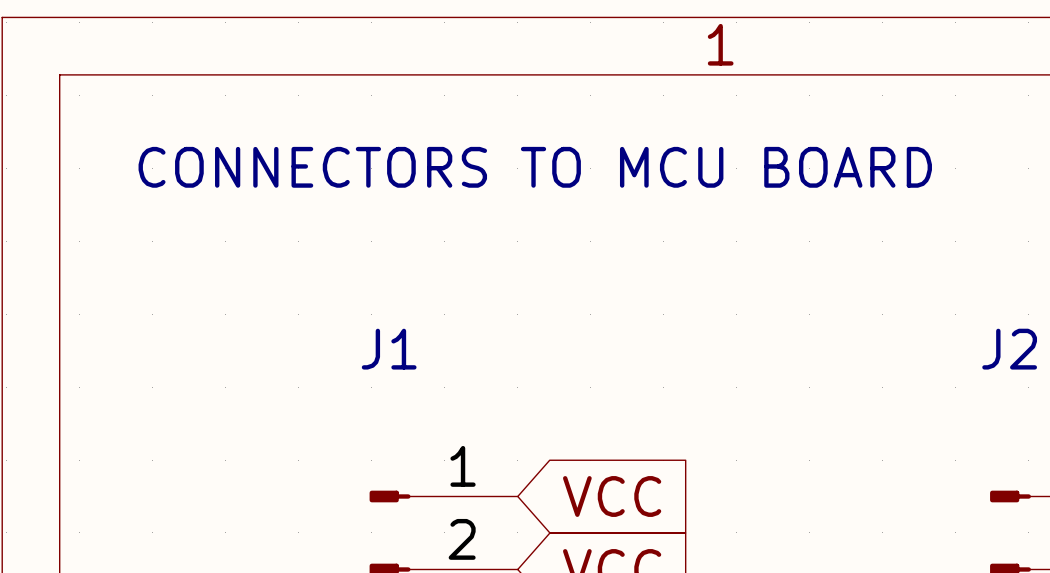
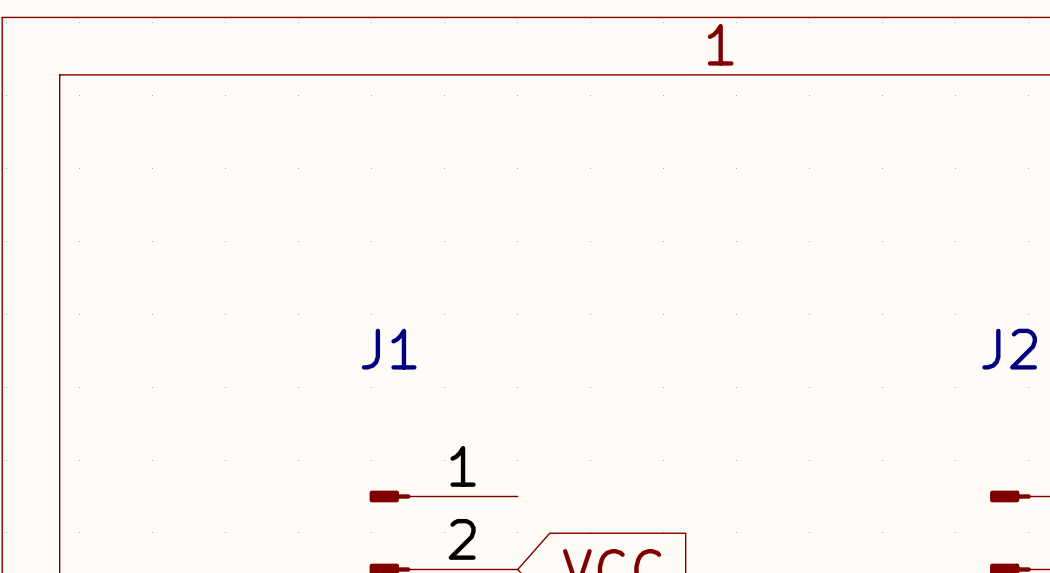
text: CONNECTORS TO MCU BOARD (535, 167) -> none
global label: VCC (612, 496) -> none

